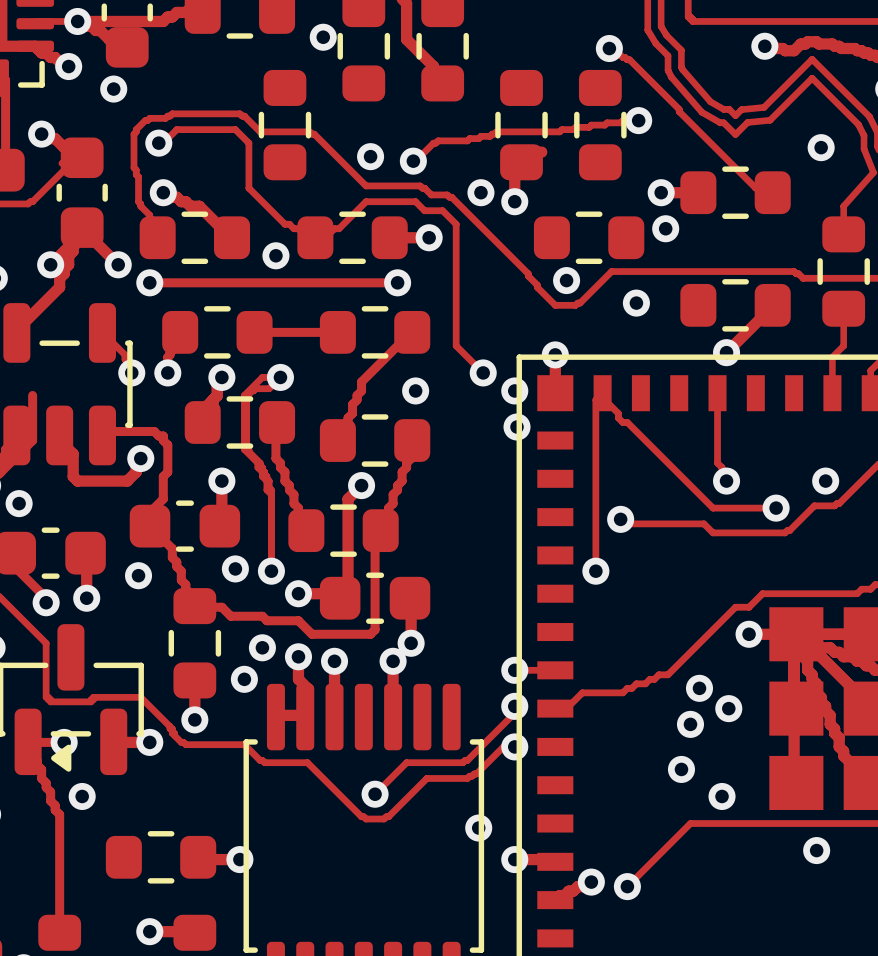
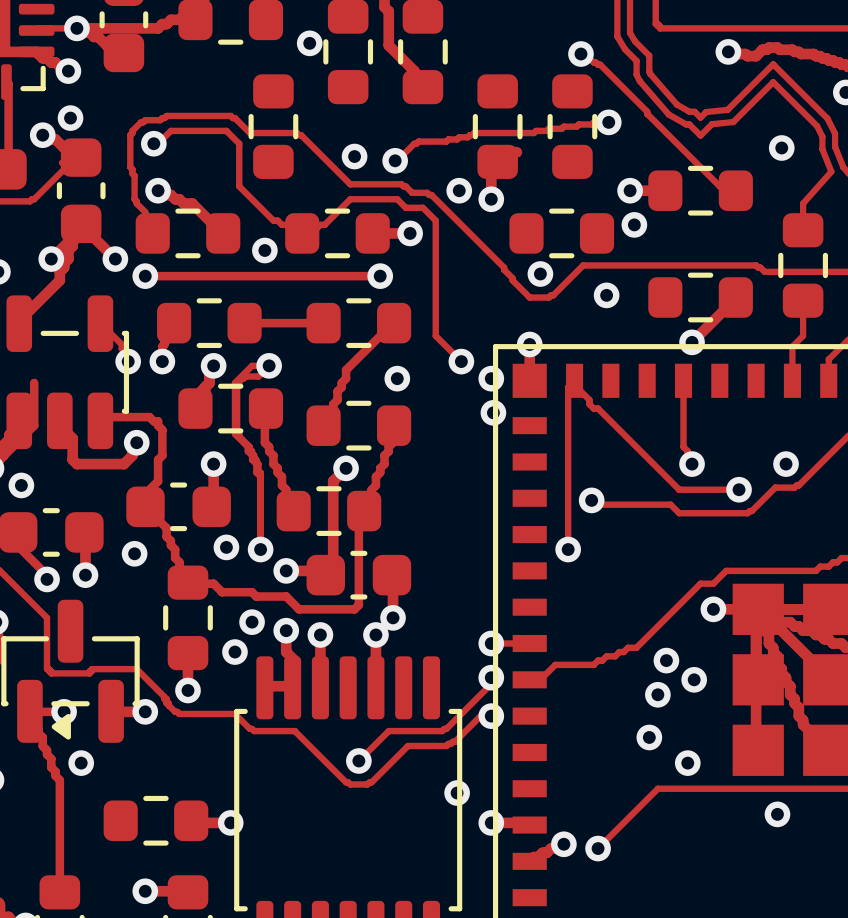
via position: (113, 89) -> (70, 118)

